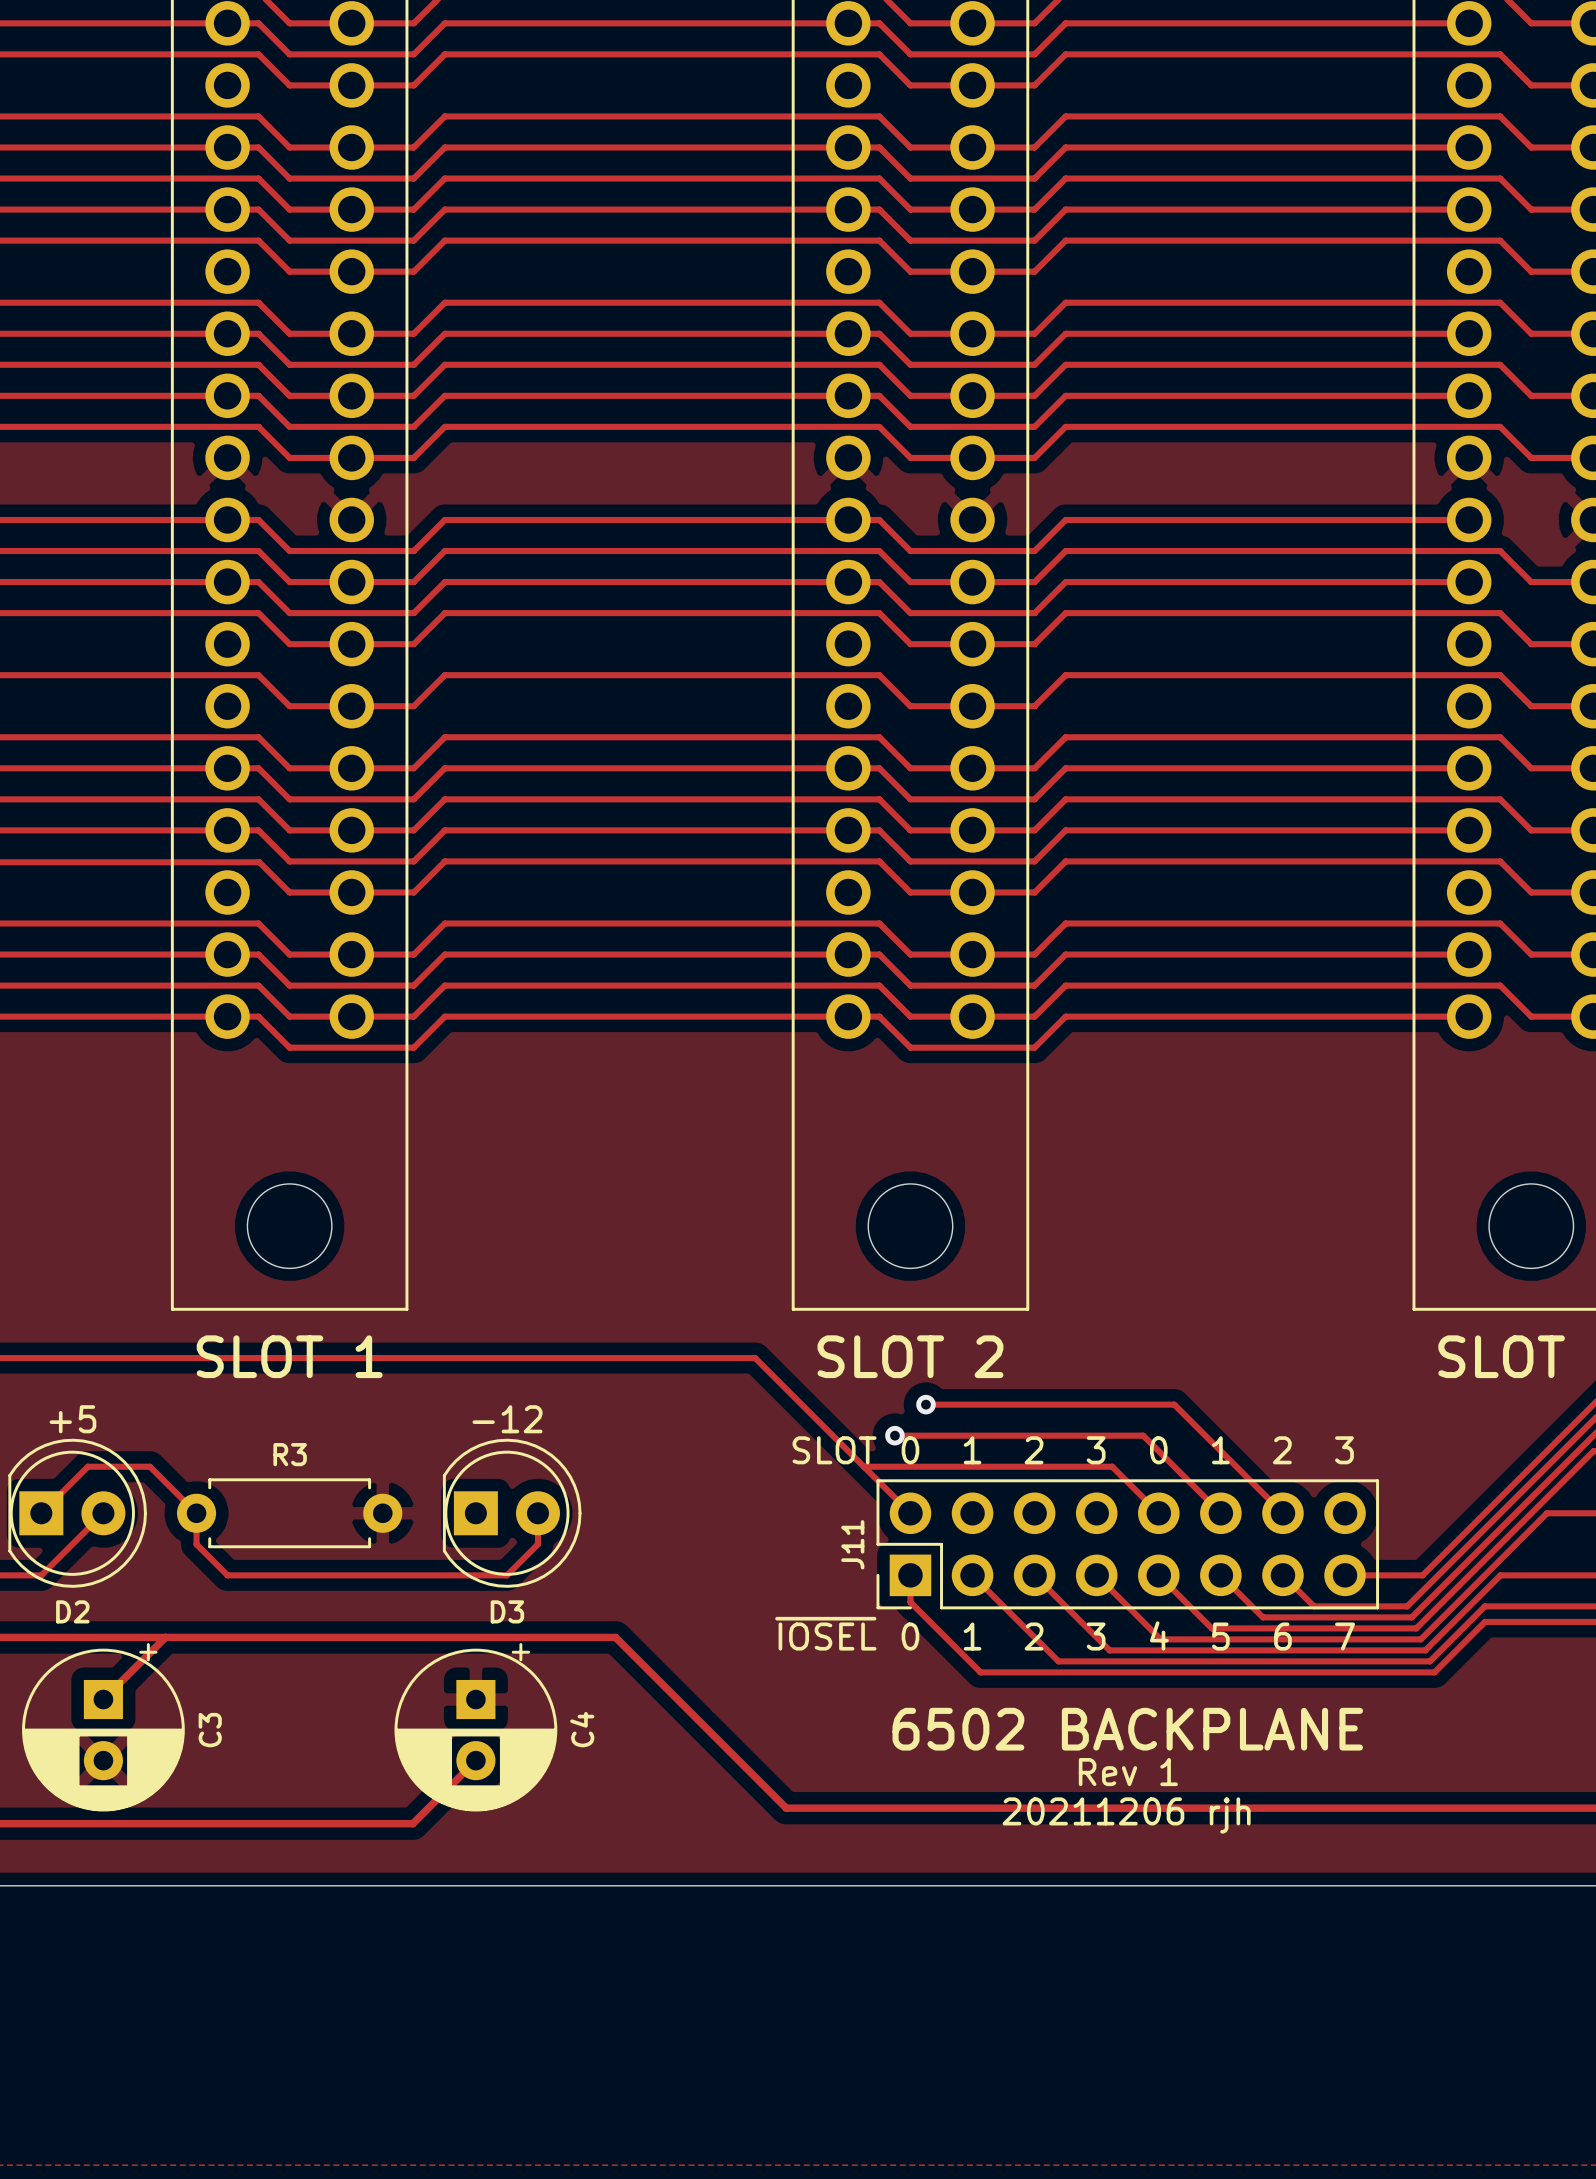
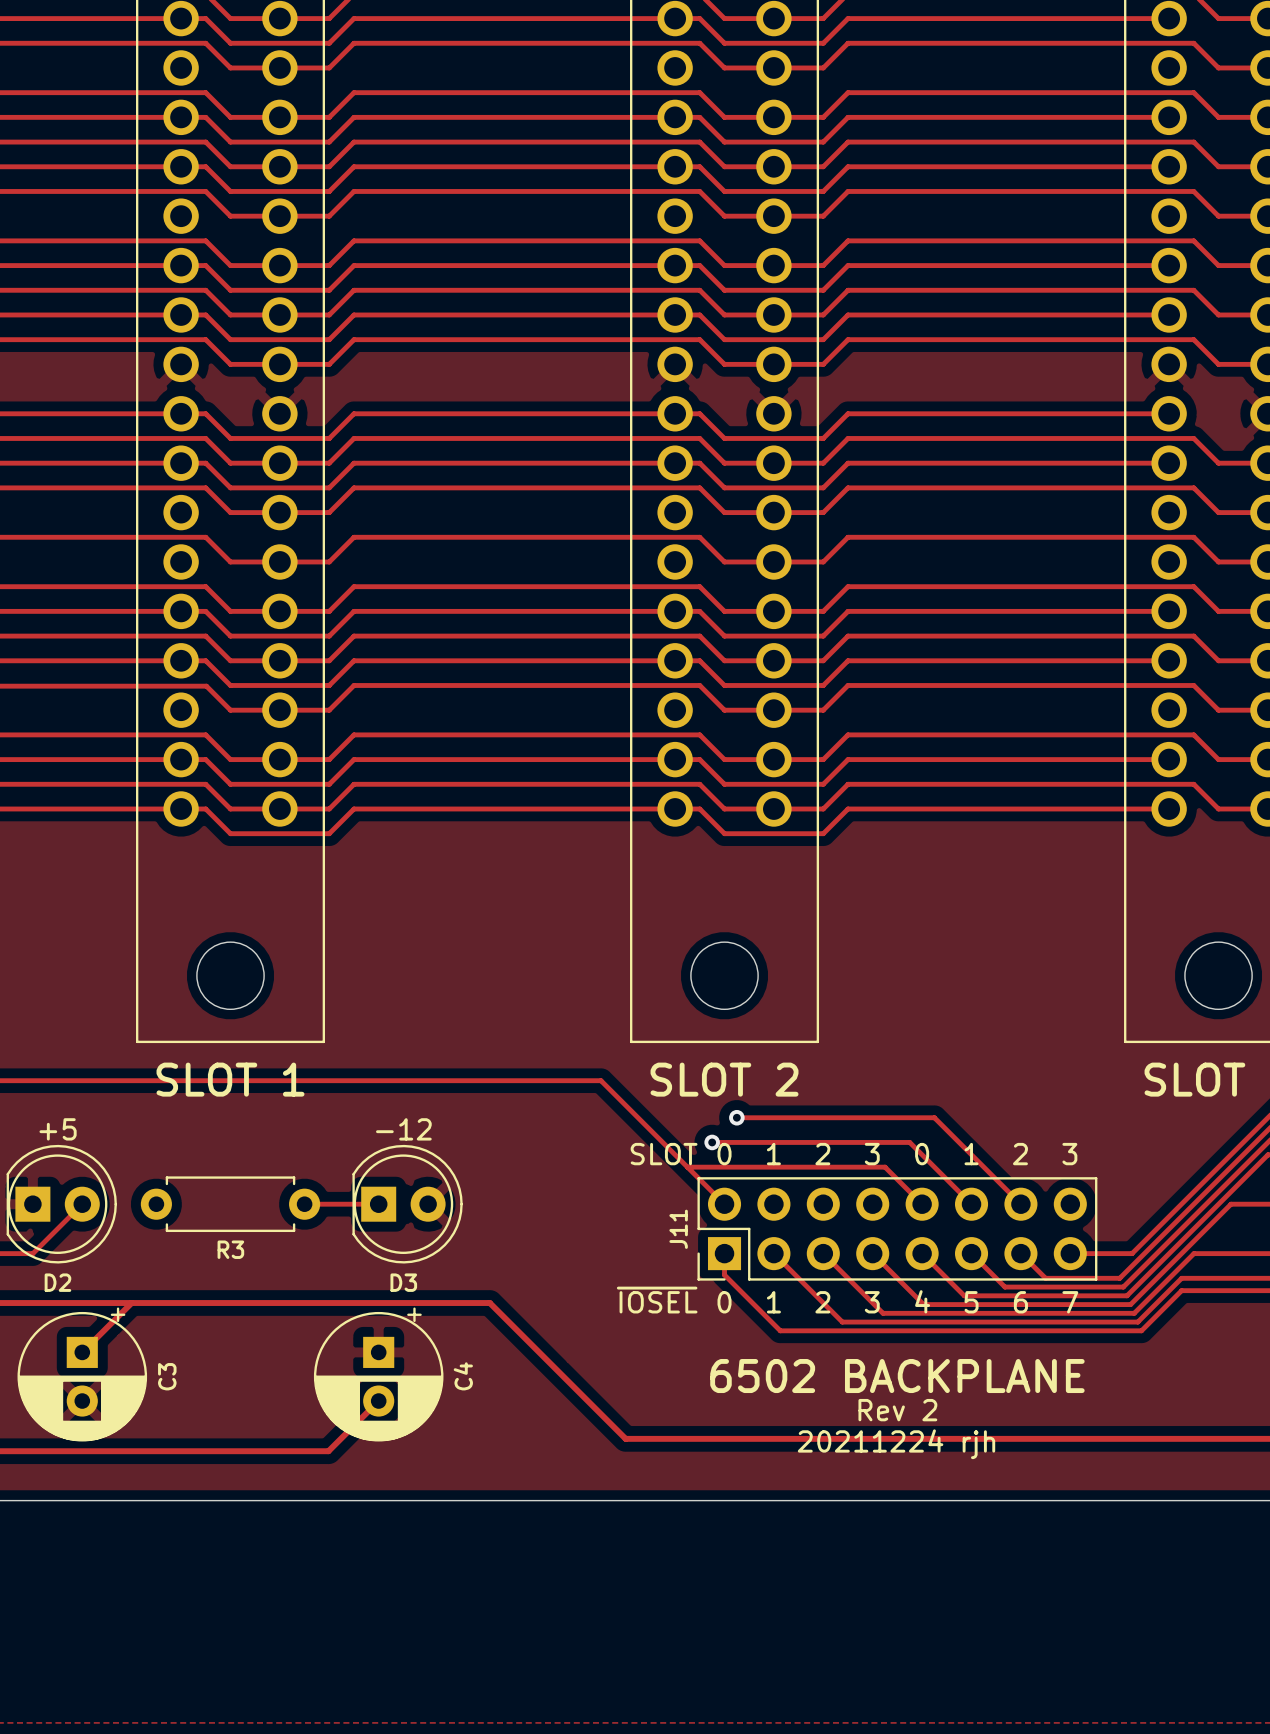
R3 name position: R3 (290, 1454) -> R3 (230, 1249)
track: (41, 1513) (87, 1466) (149, 1466) (196, 1513) (196, 1544) (227, 1575) (506, 1575) (537, 1544) (537, 1513) -> none
track: none -> (304, 1204) (378, 1204)
text: Rev 1 (1128, 1772) -> Rev 2 (897, 1410)
text: 20211206 rjh (1126, 1815) -> 20211224 rjh (896, 1444)

